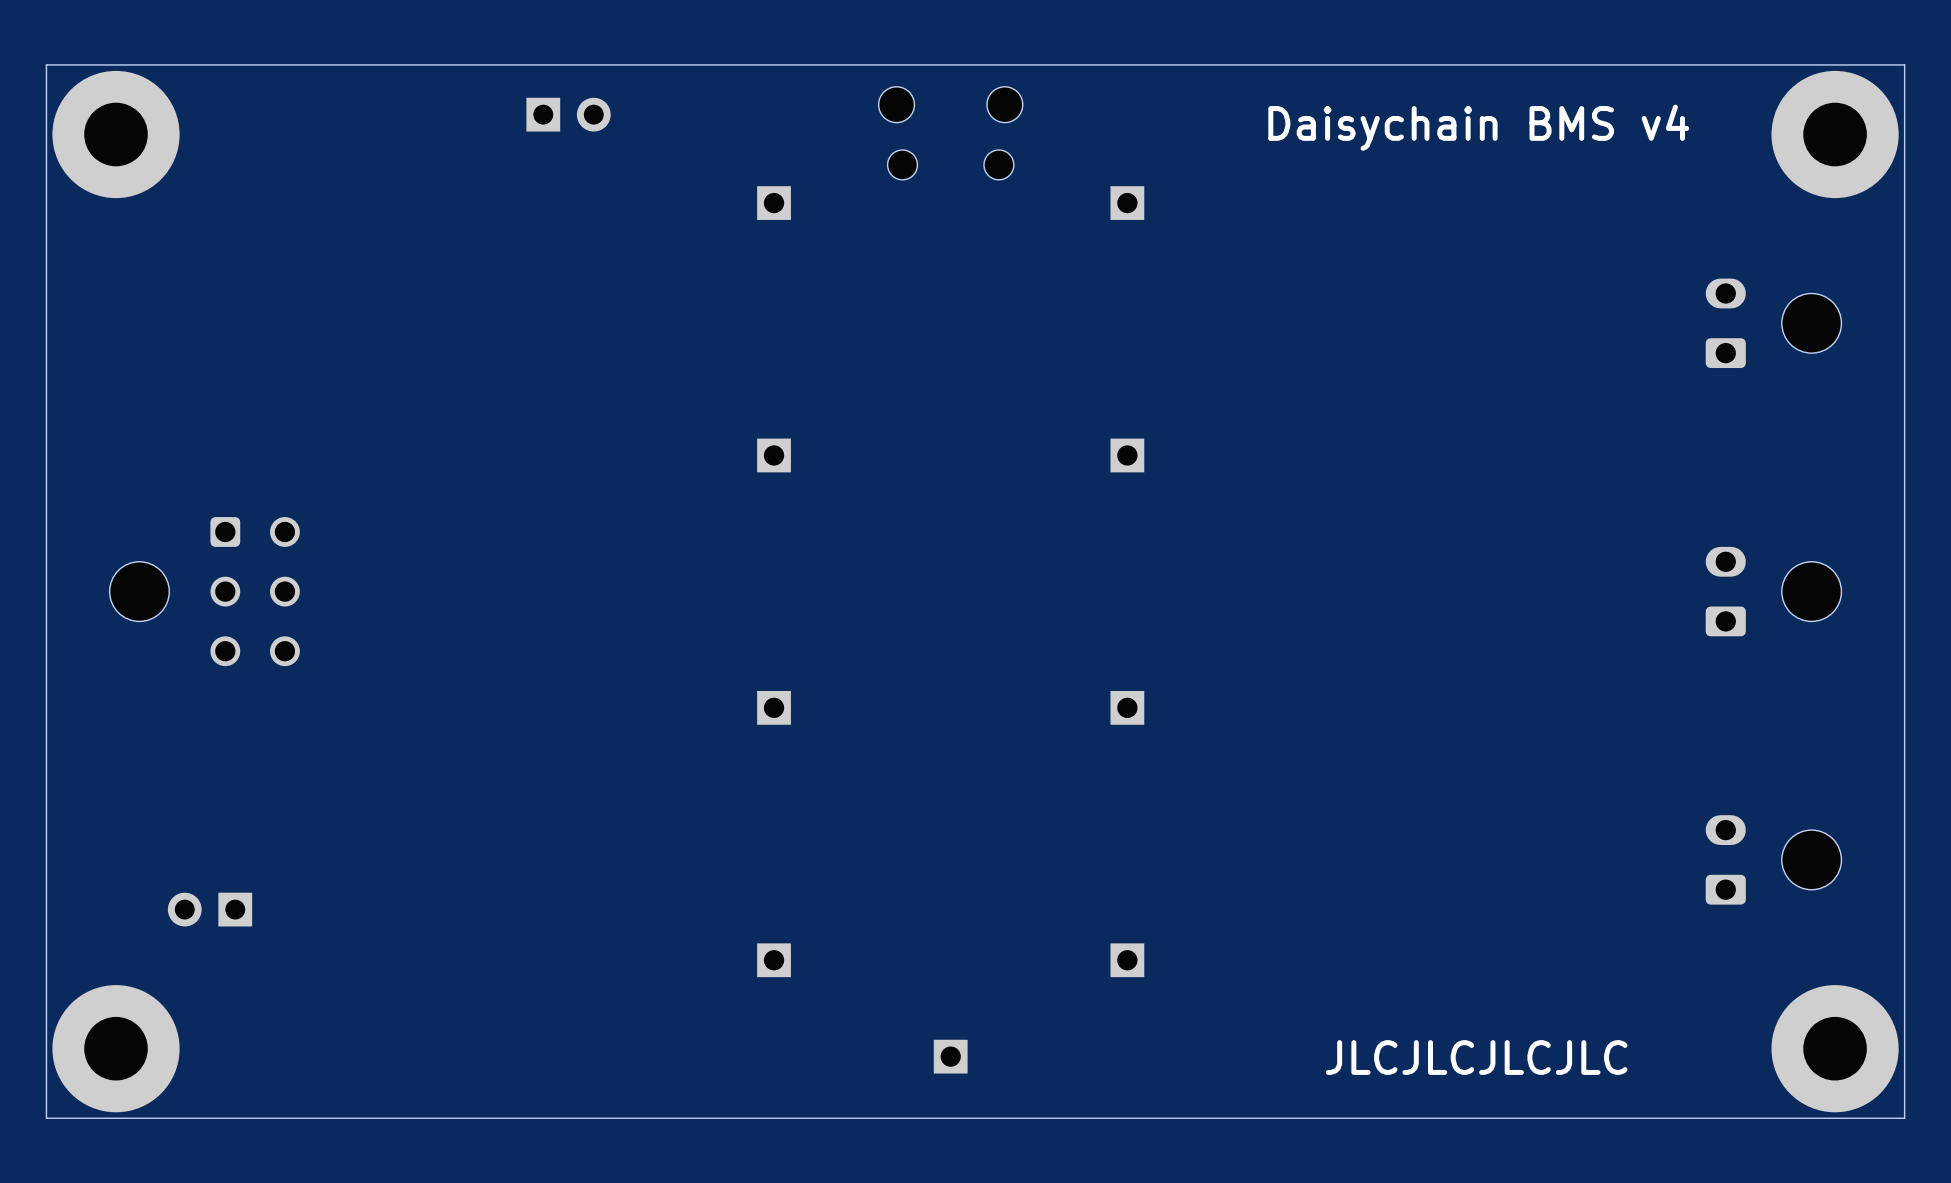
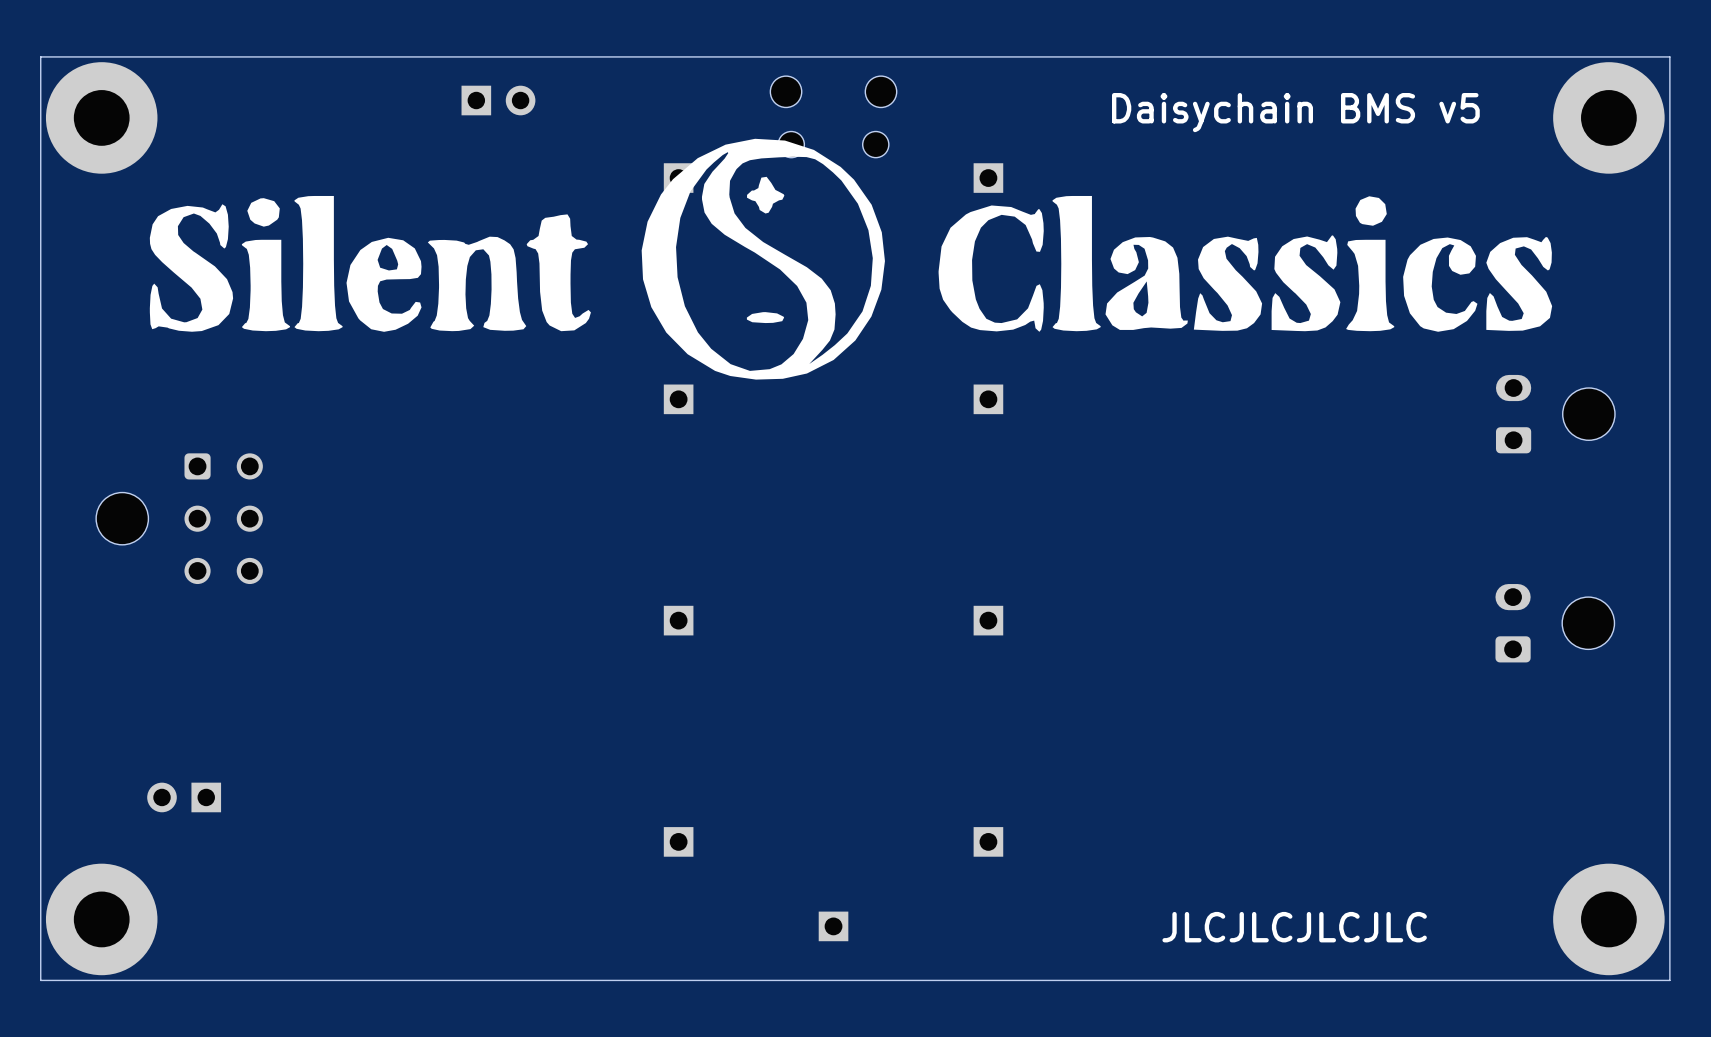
text: Daisychain BMS v4 (1478, 127) -> Daisychain BMS v5 (1295, 112)
drawing: none -> [149, 138, 1553, 380]
part: (1773, 323) -> none
part: none -> (1555, 414)
part: (1773, 591) -> none
part: none -> (1554, 623)
part: (1773, 859) -> none

